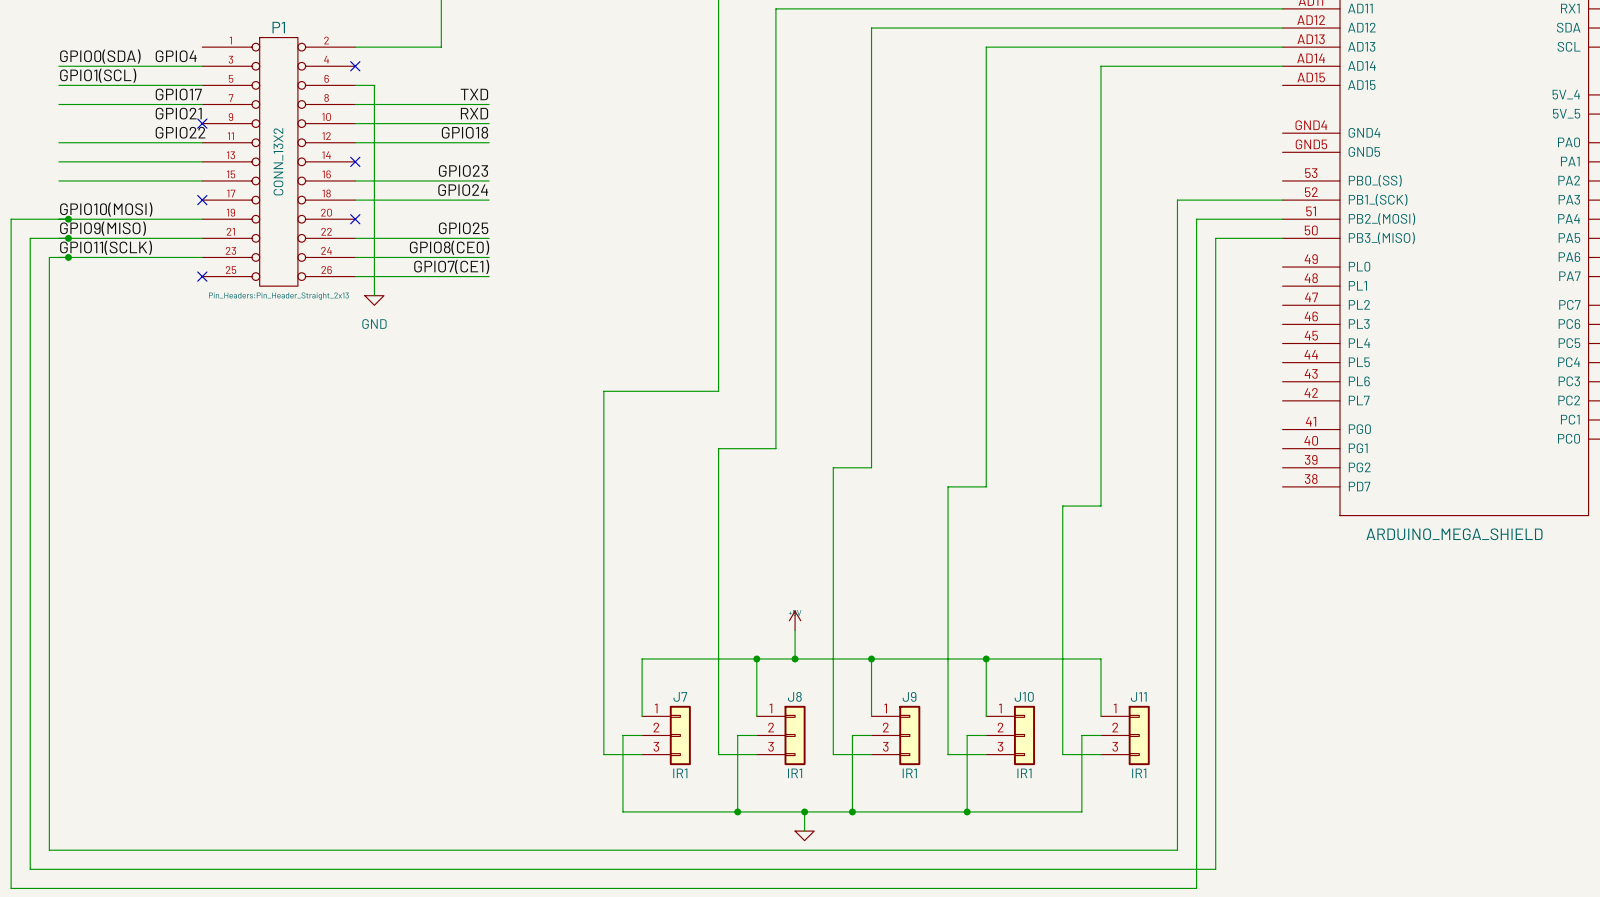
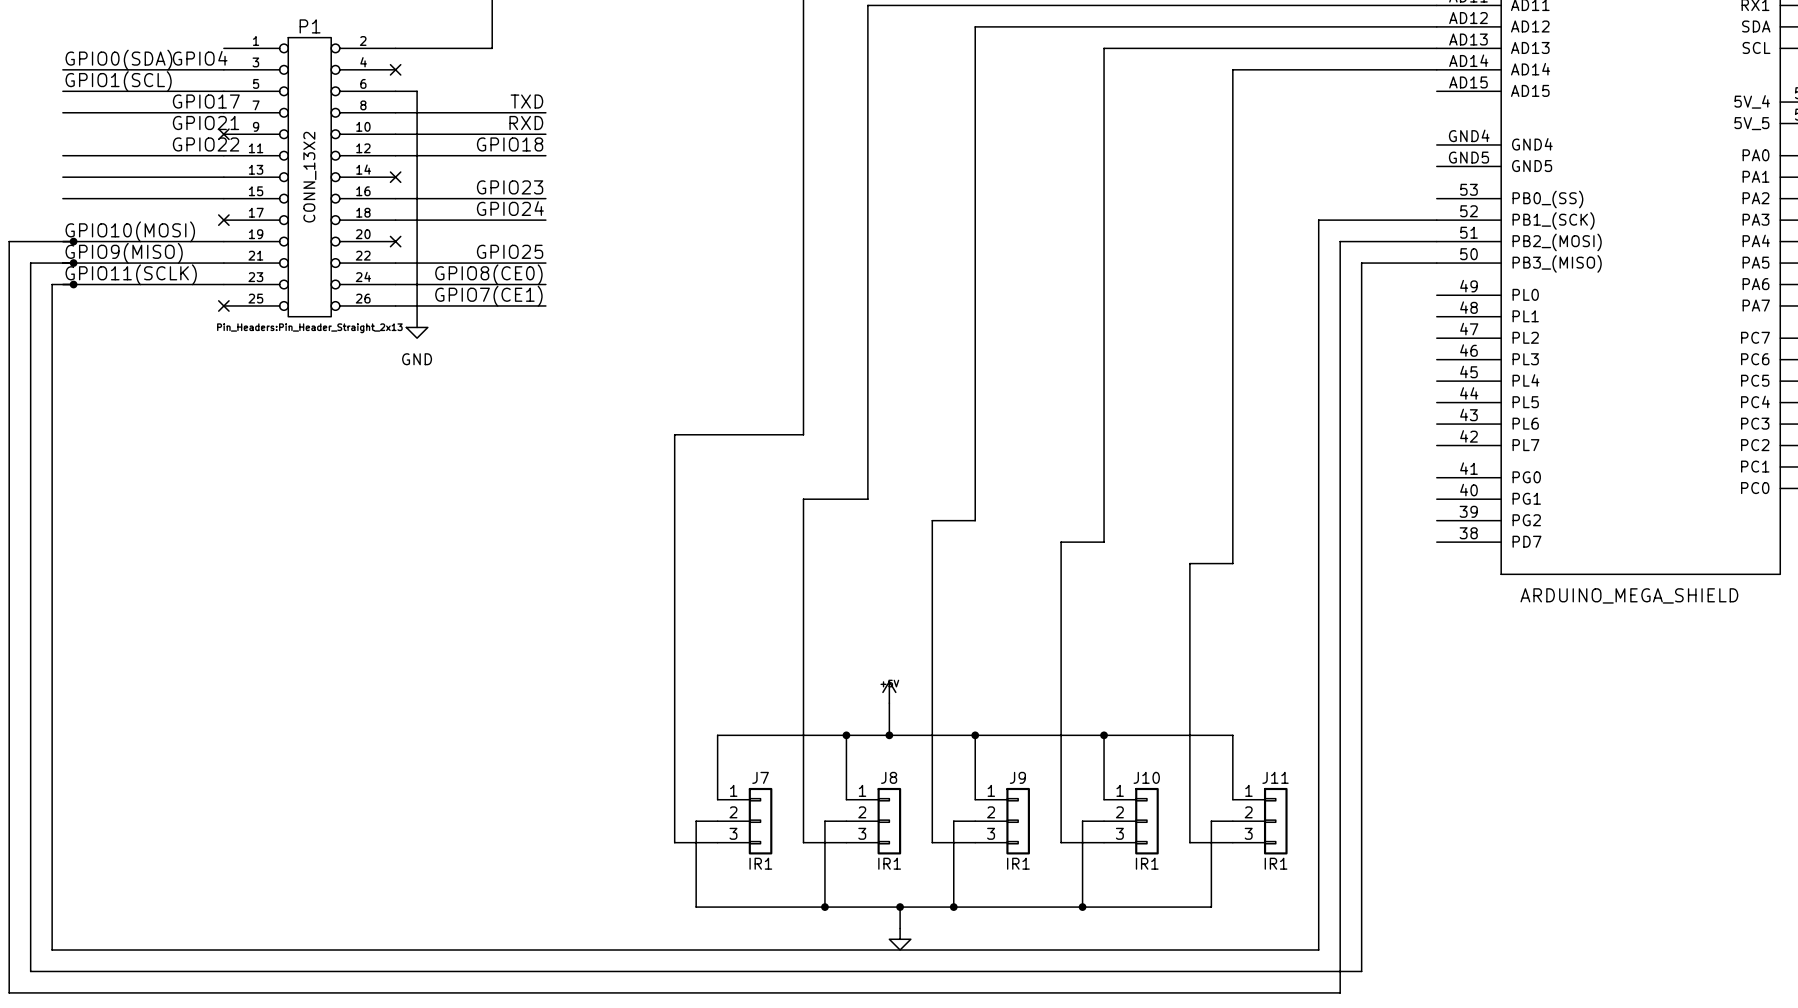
power symbol shape: [795, 831, 815, 841] -> [889, 928, 911, 951]

